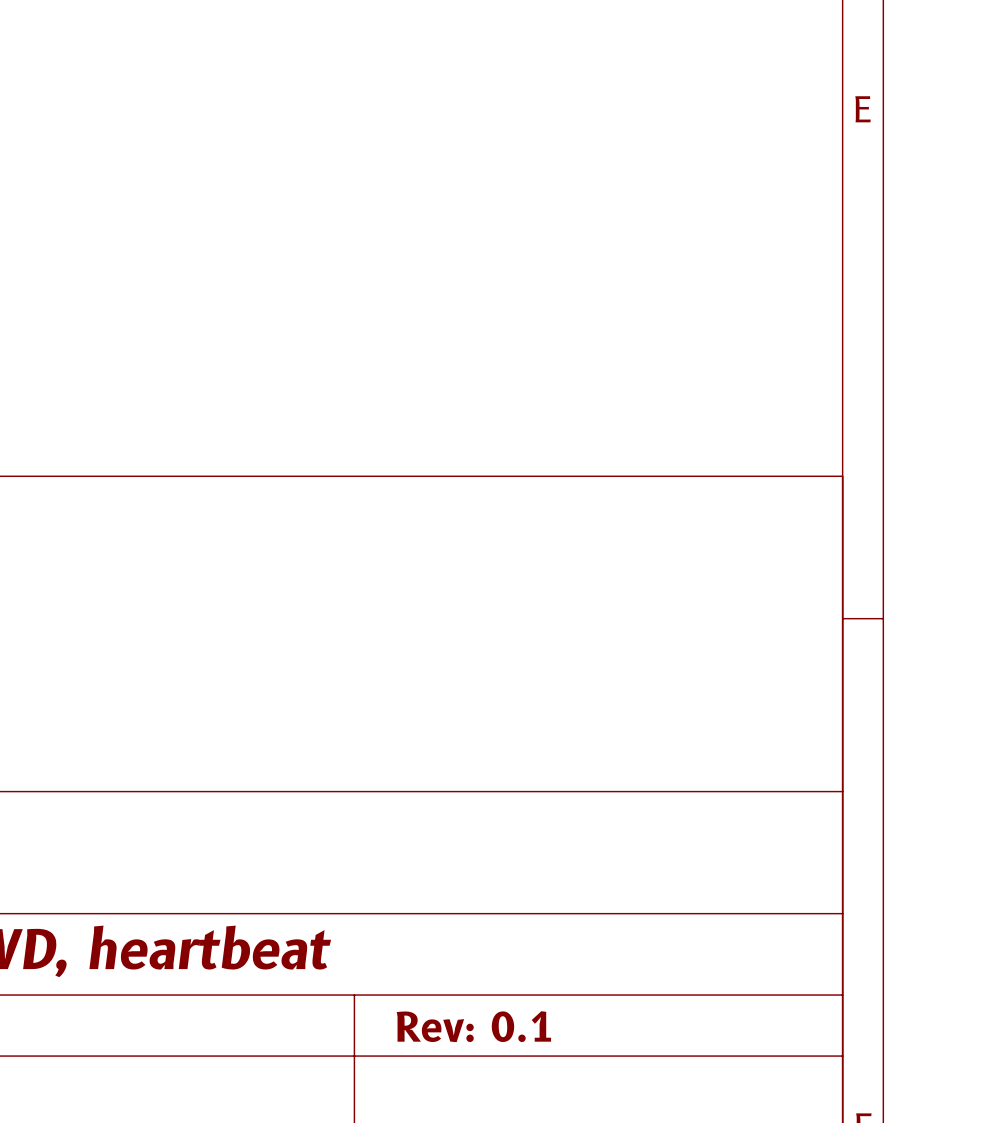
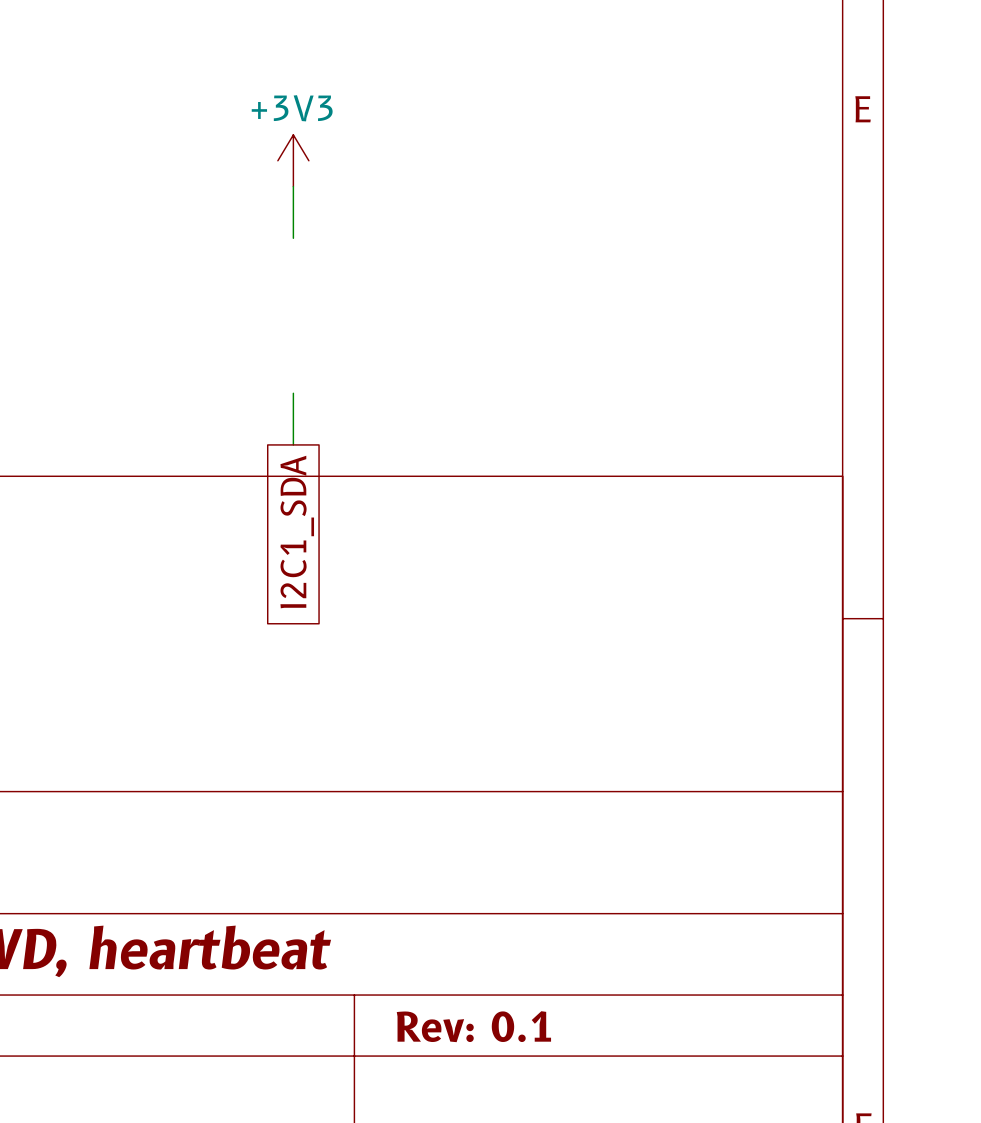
power symbol: none -> +3V3 (293, 160)
wire: none -> (293, 186) (293, 238)
wire: none -> (293, 393) (293, 444)
global label: none -> I2C1_SDA (297, 532)

